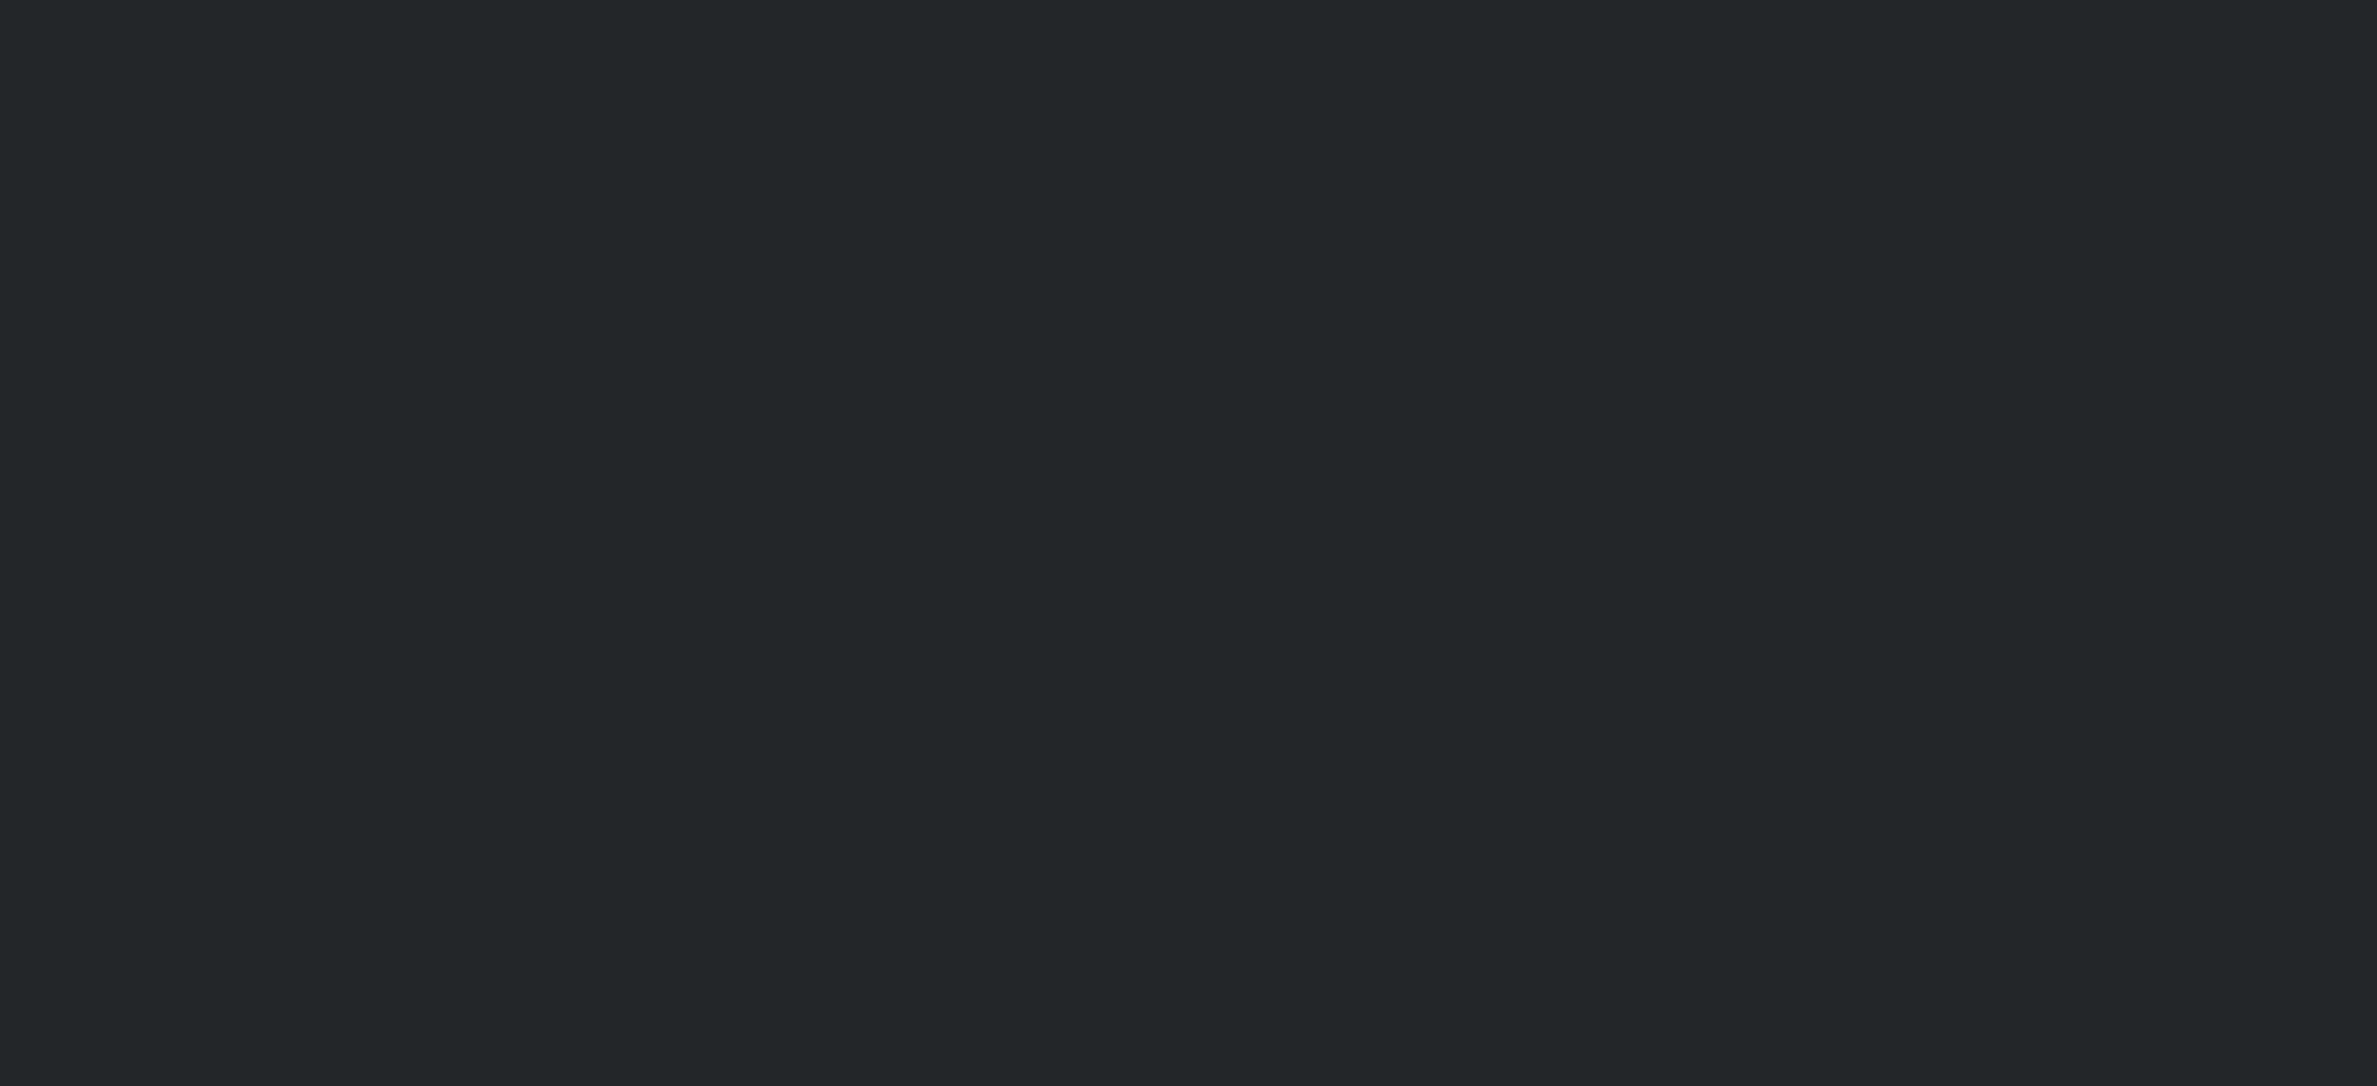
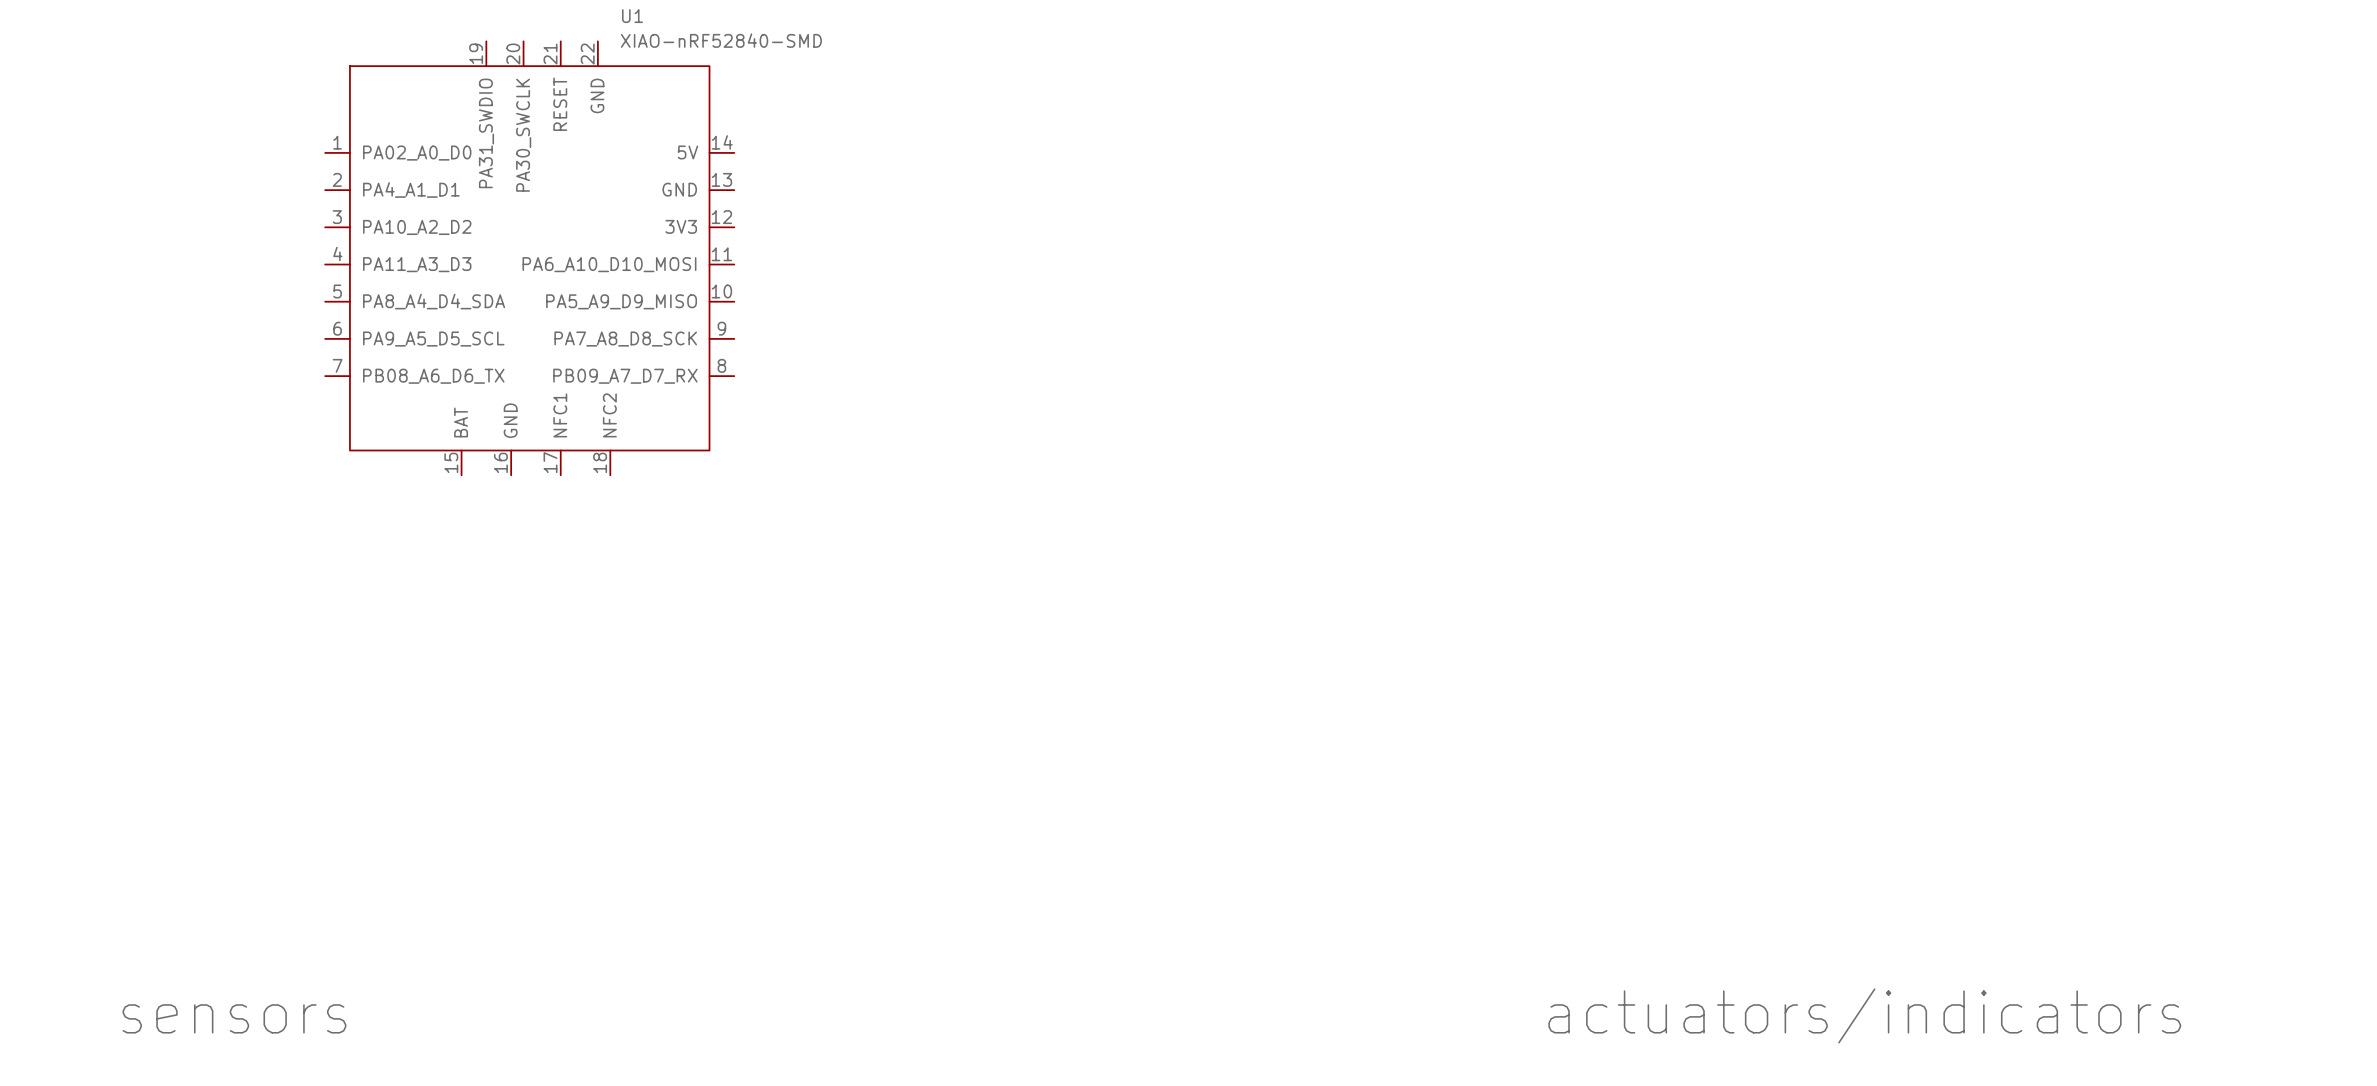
U1: none -> XIAO-nRF52840-SMD (529, 258)
label: none -> actuators/indicators (1864, 1015)
label: none -> sensors (234, 1018)

